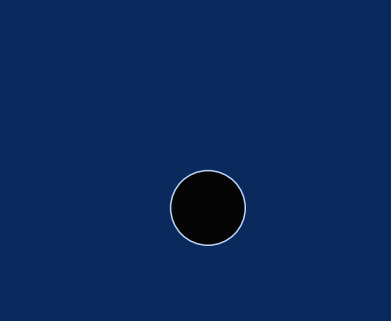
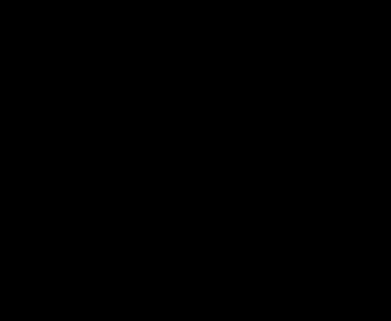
part: (207, 207) -> none

